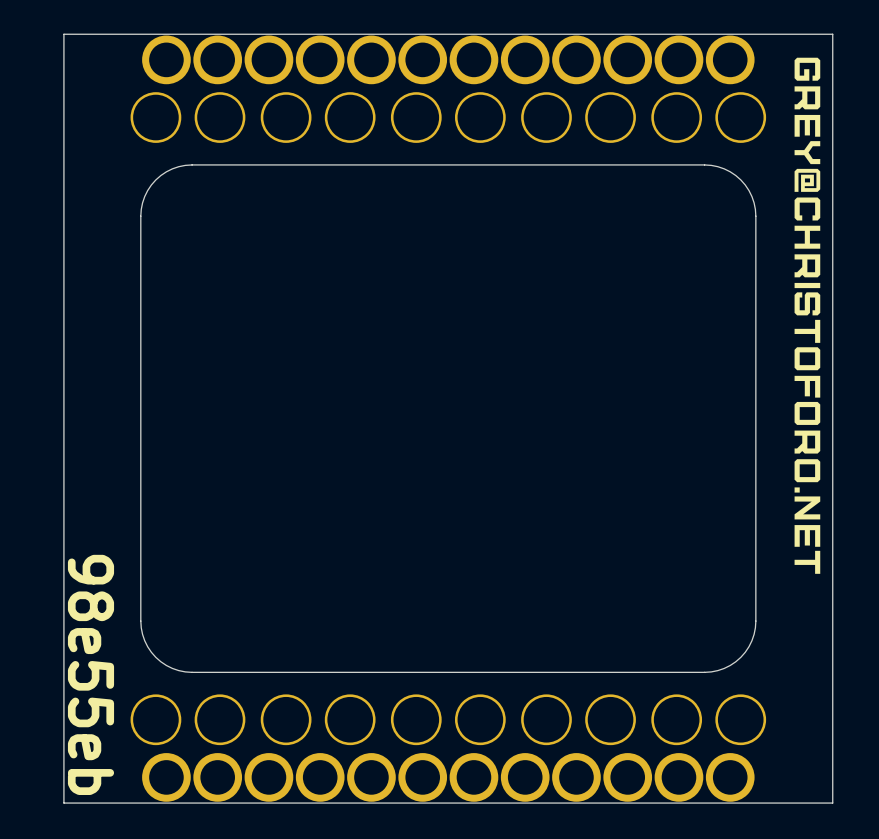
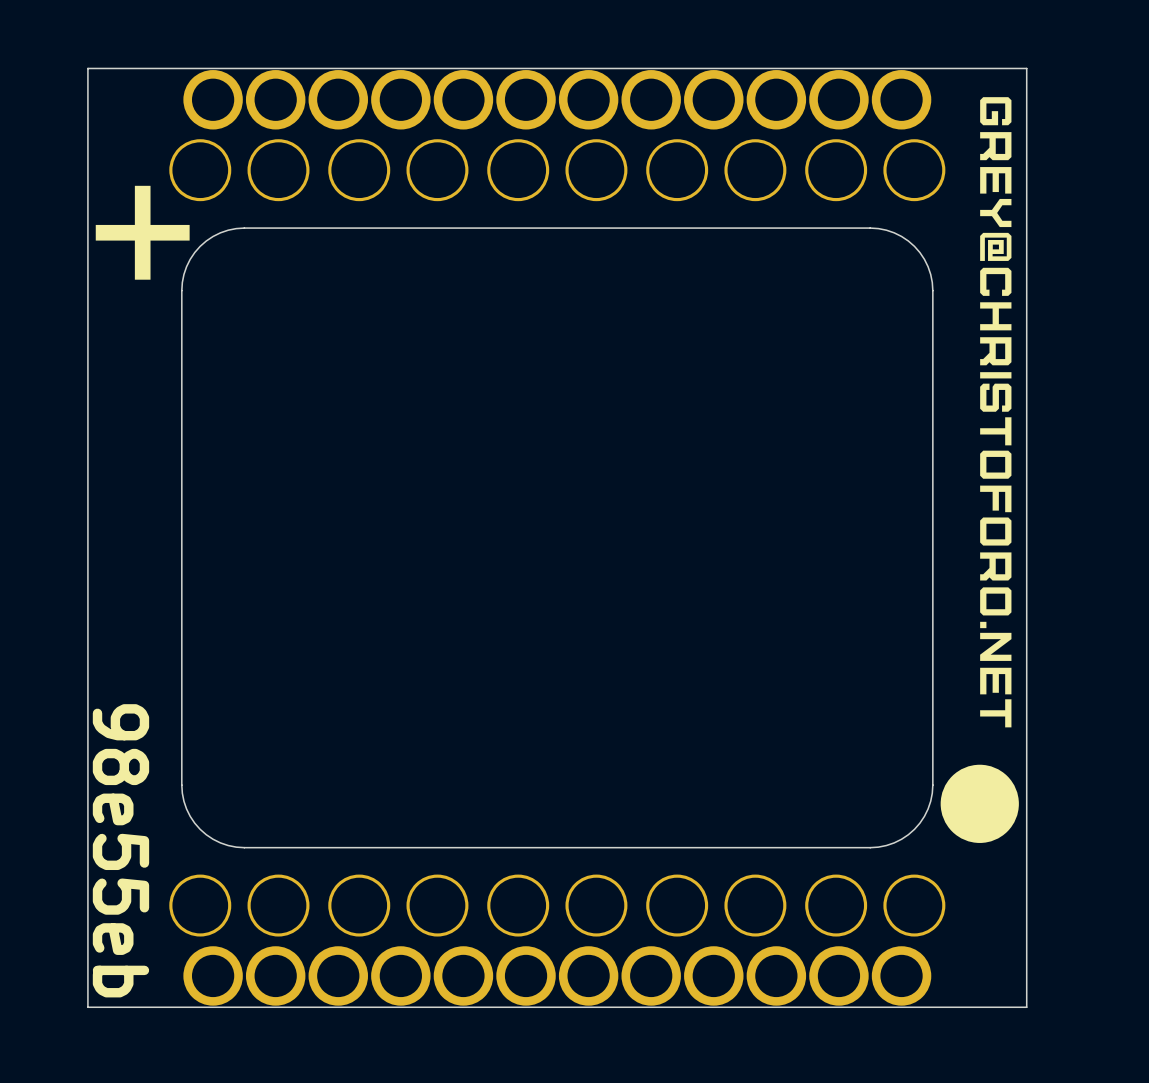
drawing: none -> [95, 185, 190, 280]
drawing: none -> [940, 764, 1019, 843]

